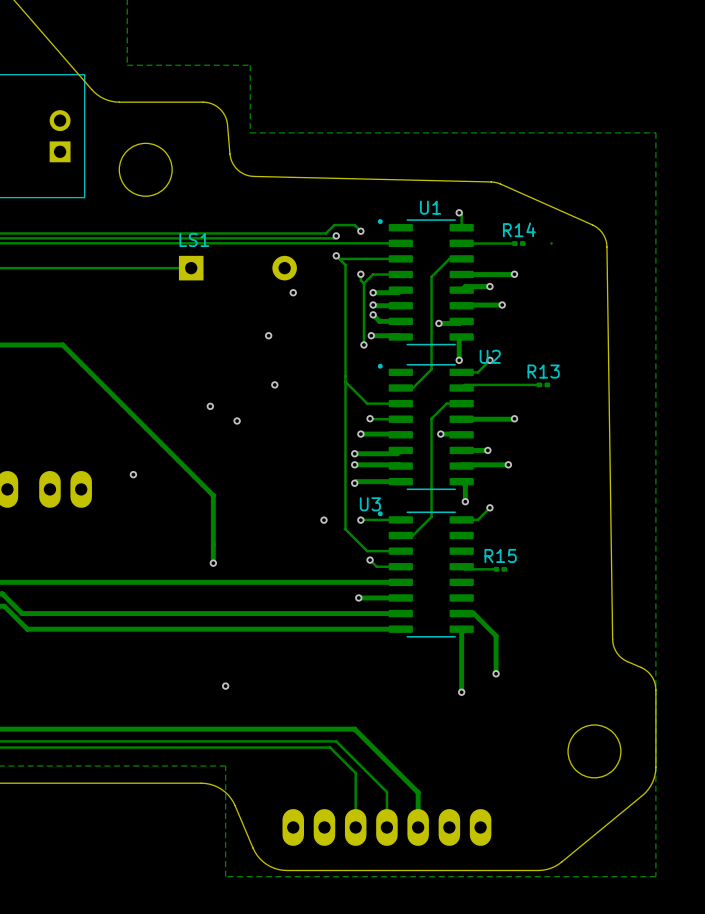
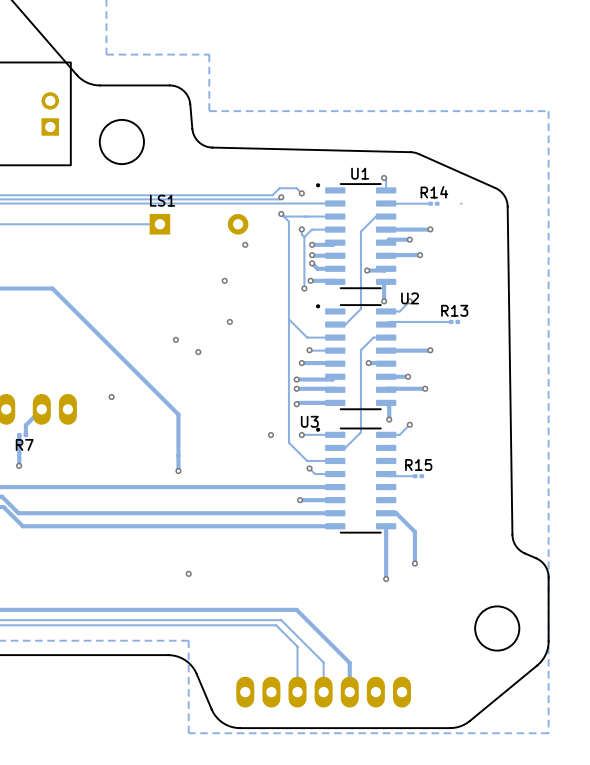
track: none -> (41, 409) (25, 425) (25, 435)
track: none -> (19, 435) (19, 465)
R7: none -> (22, 435)
via: none -> (19, 465)

